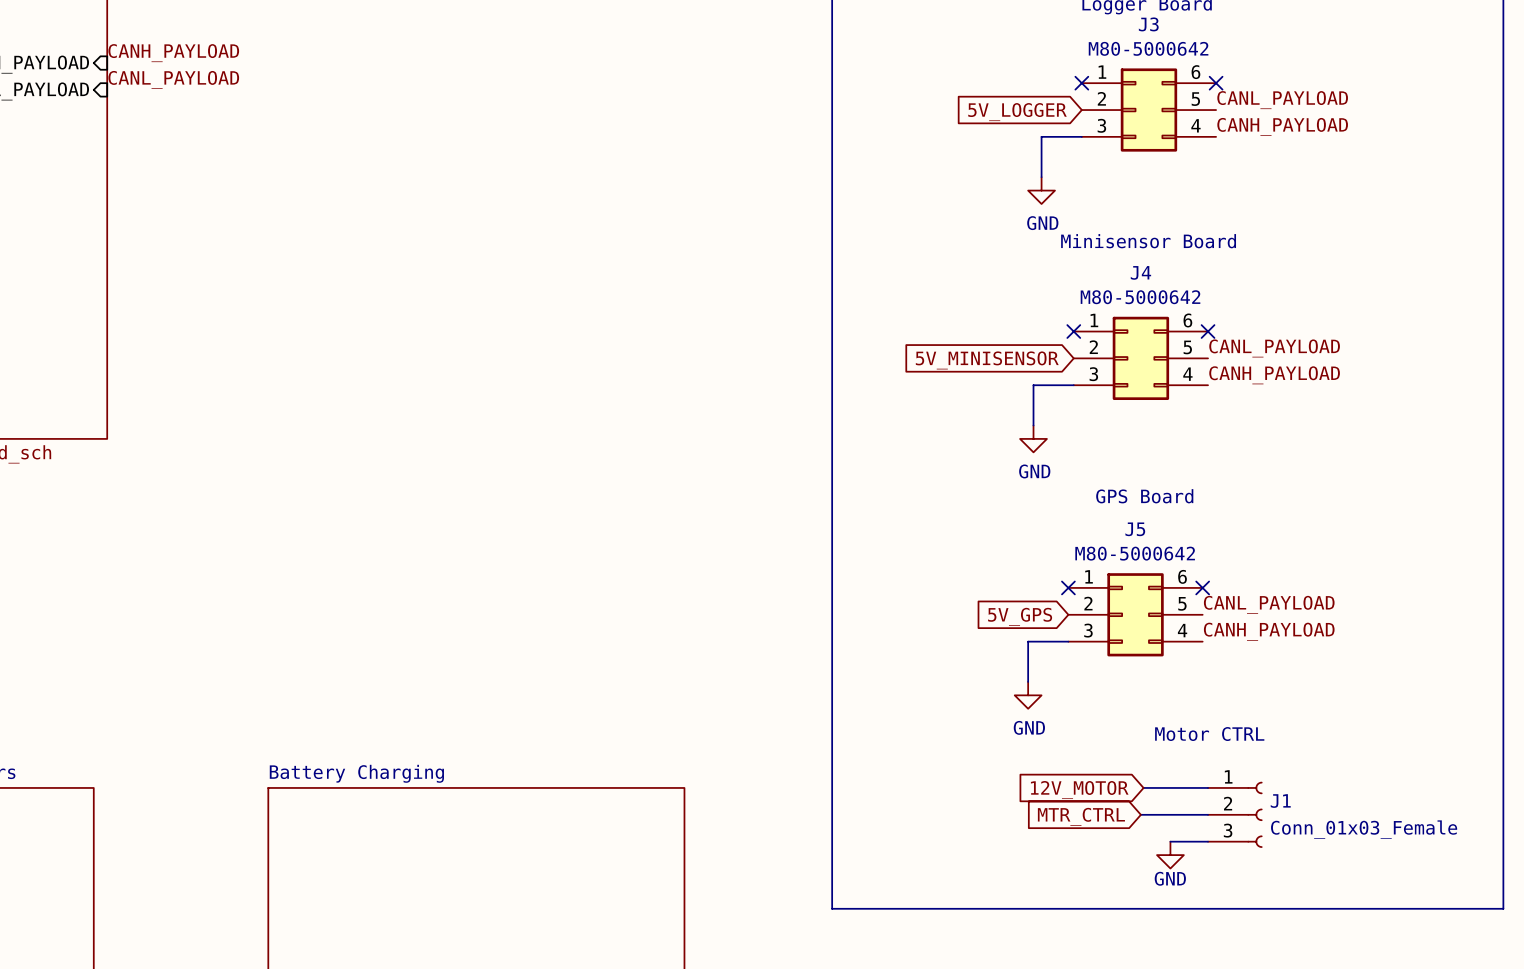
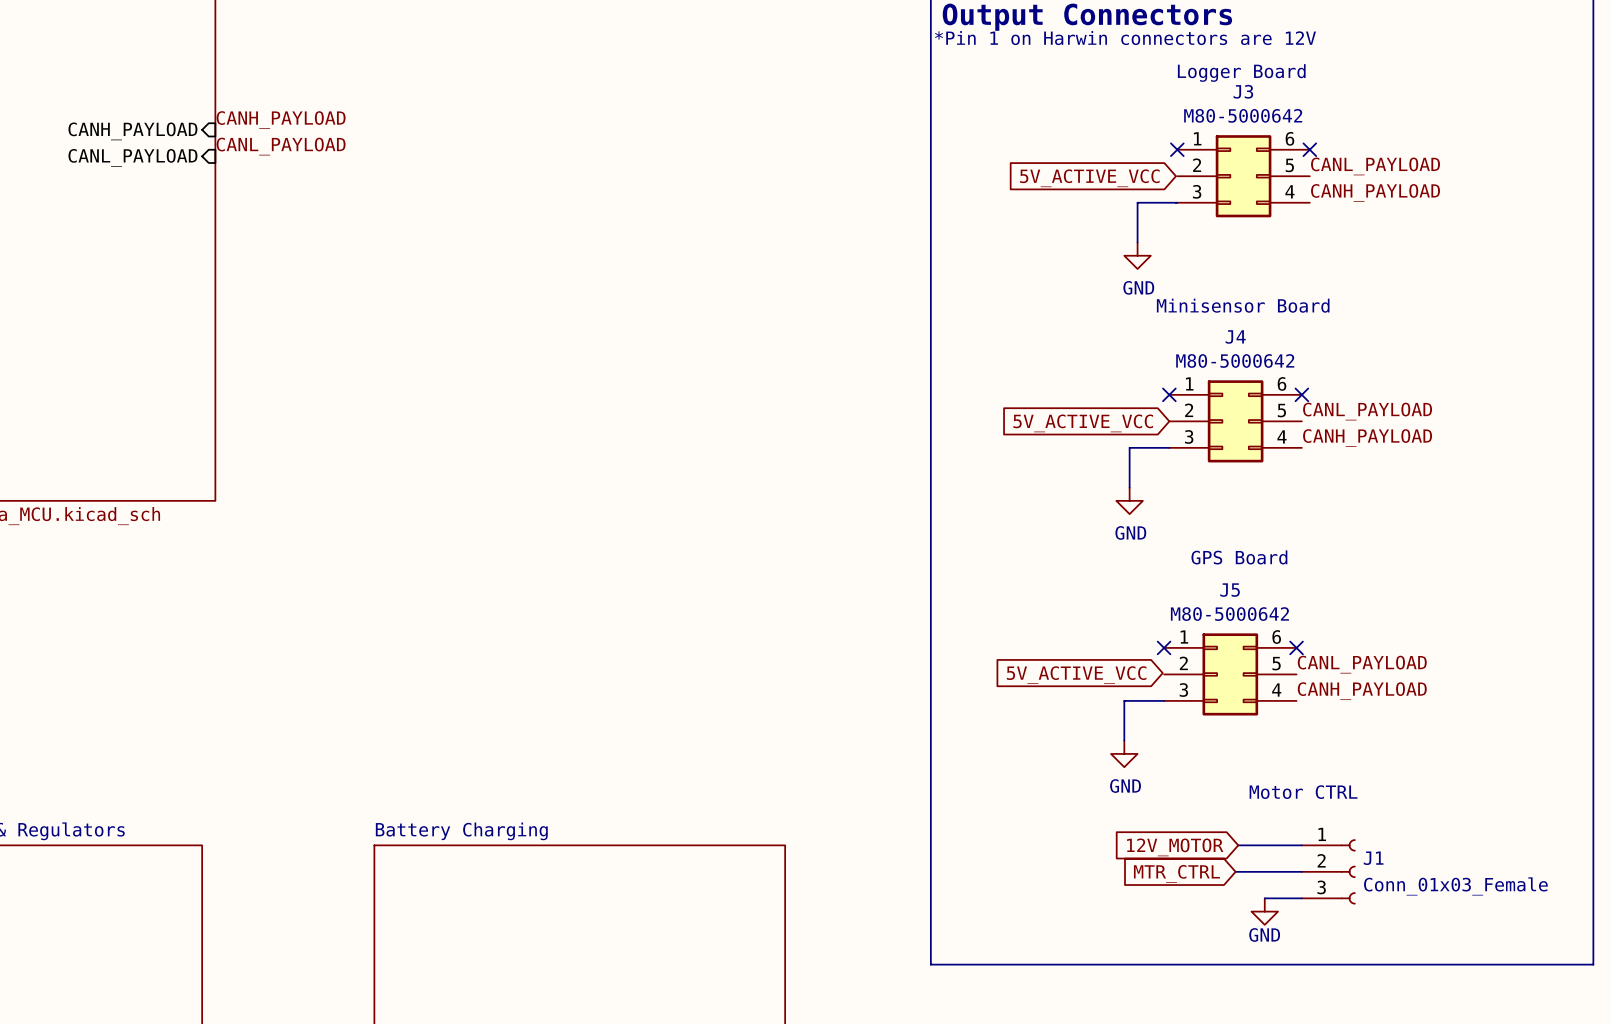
global label: 5V_LOGGER (1017, 112) -> 5V_ACTIVE_VCC (1089, 178)
global label: 5V_MINISENSOR (987, 360) -> 5V_ACTIVE_VCC (1083, 423)
global label: 5V_GPS (1020, 616) -> 5V_ACTIVE_VCC (1076, 675)

